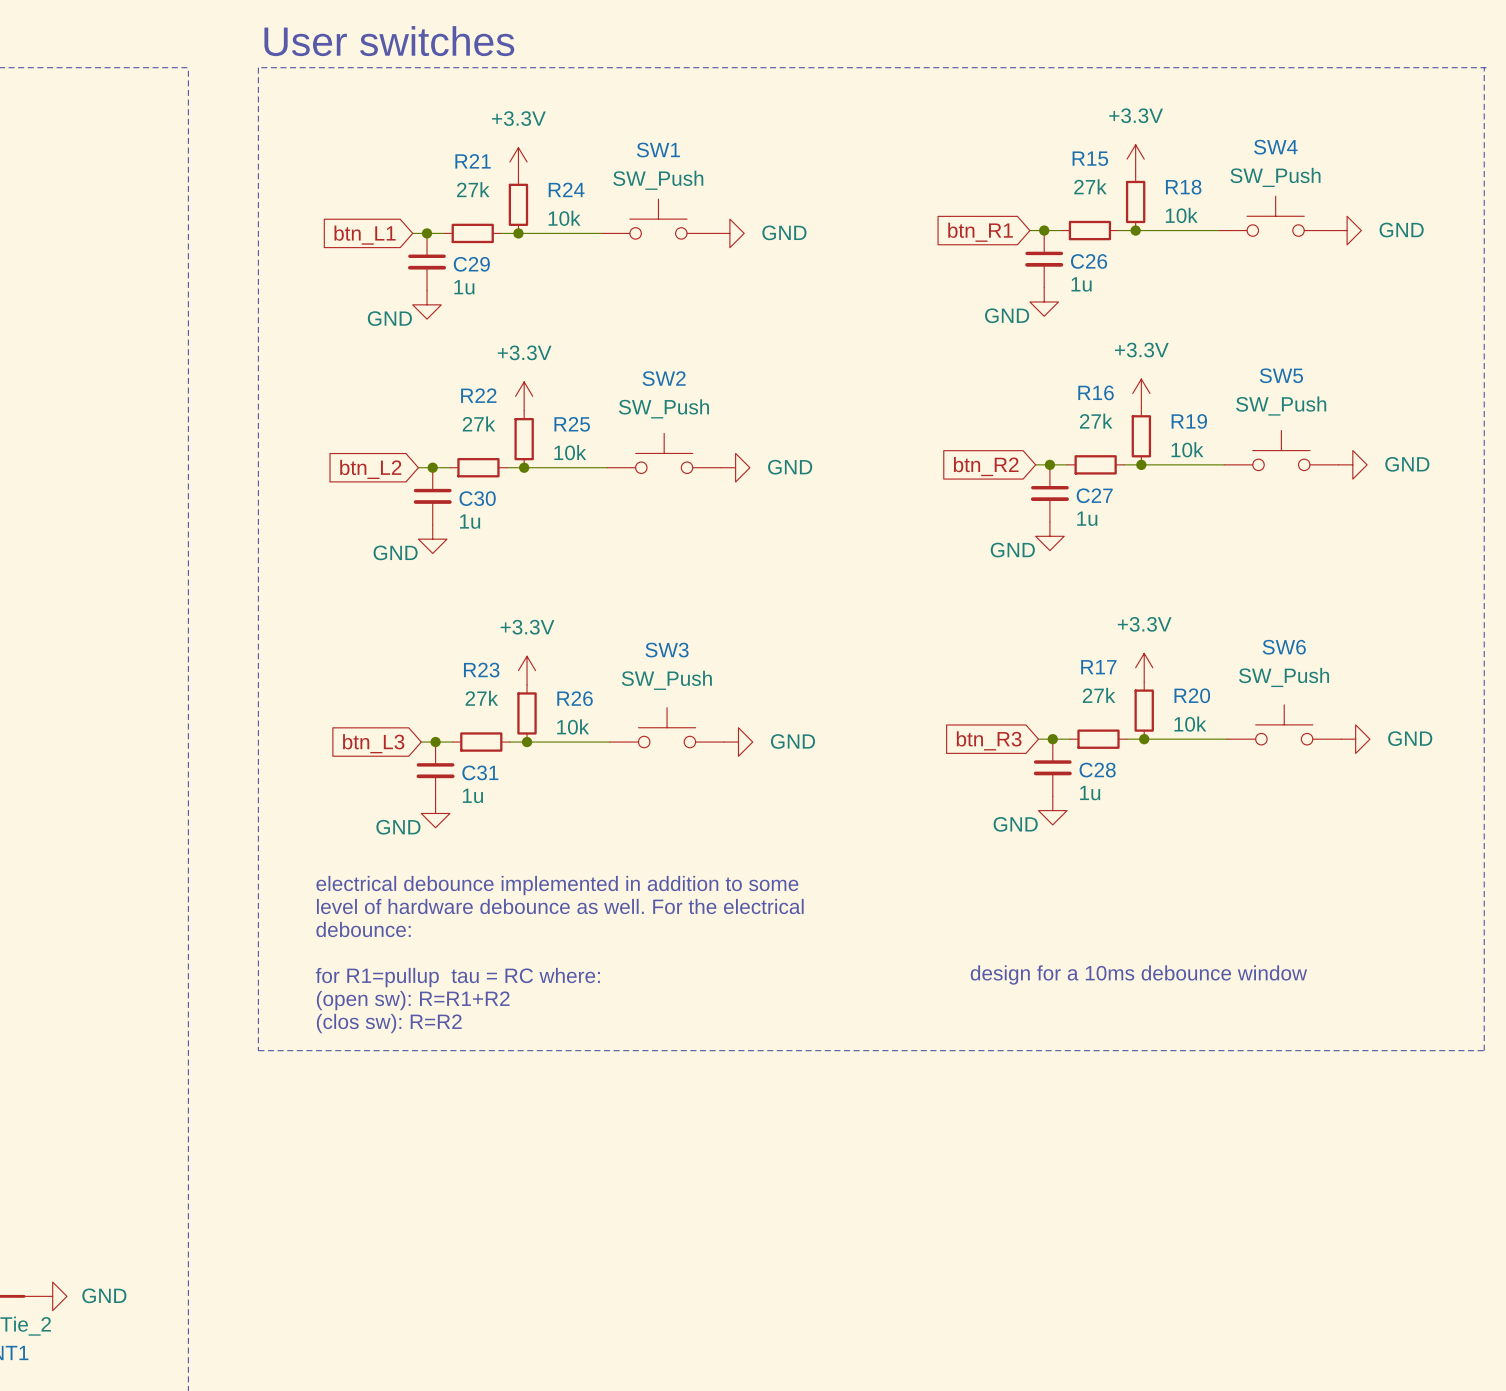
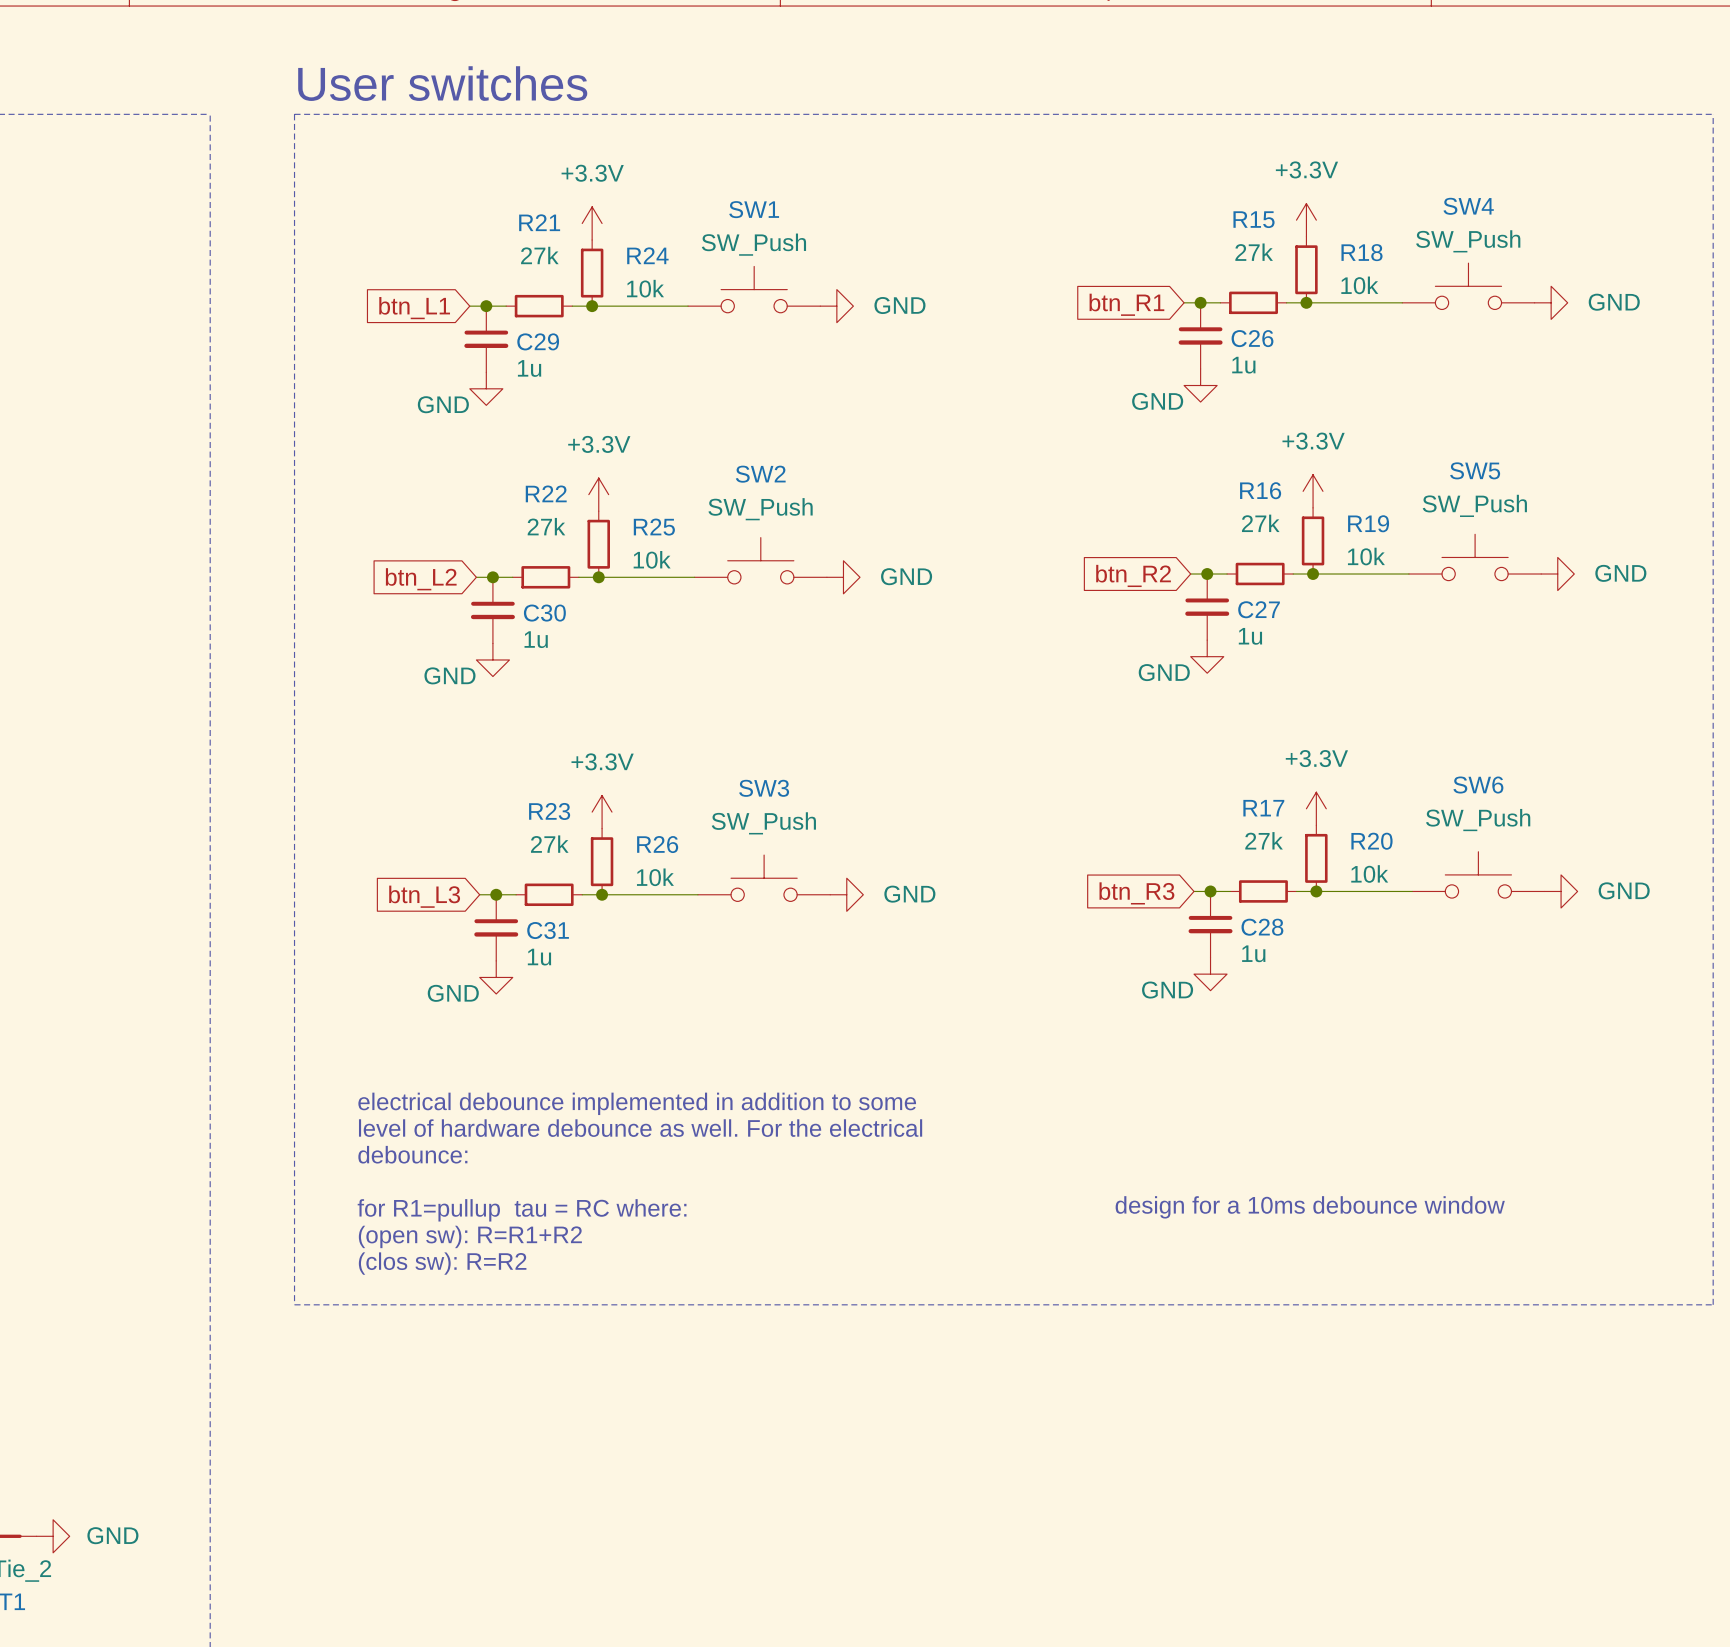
line: (258, 67) (258, 1050) (1484, 1050) (1484, 67) -> none
line: none -> (294, 114) (294, 1304) (1713, 1304) (1713, 114)
text position: electrical debounce implemented in addition to some (557, 885) -> electrical debounce implemented in addition to some (637, 1103)
text position: level of hardware debounce as well. For the electrical (560, 906) -> level of hardware debounce as well. For the electrical (640, 1128)
text: debounce: (363, 929) -> none
text position: design for a 10ms debounce window (1138, 974) -> design for a 10ms debounce window (1310, 1207)
text: for R1=pullup tau = RC where: (457, 977) -> debounce: (412, 1154)
text position: (open sw): R=R1+R2 (413, 1000) -> (open sw): R=R1+R2 (470, 1236)
text: none -> for R1=pullup tau = RC where: (522, 1210)
text position: (clos sw): R=R2 (389, 1023) -> (clos sw): R=R2 (442, 1263)

